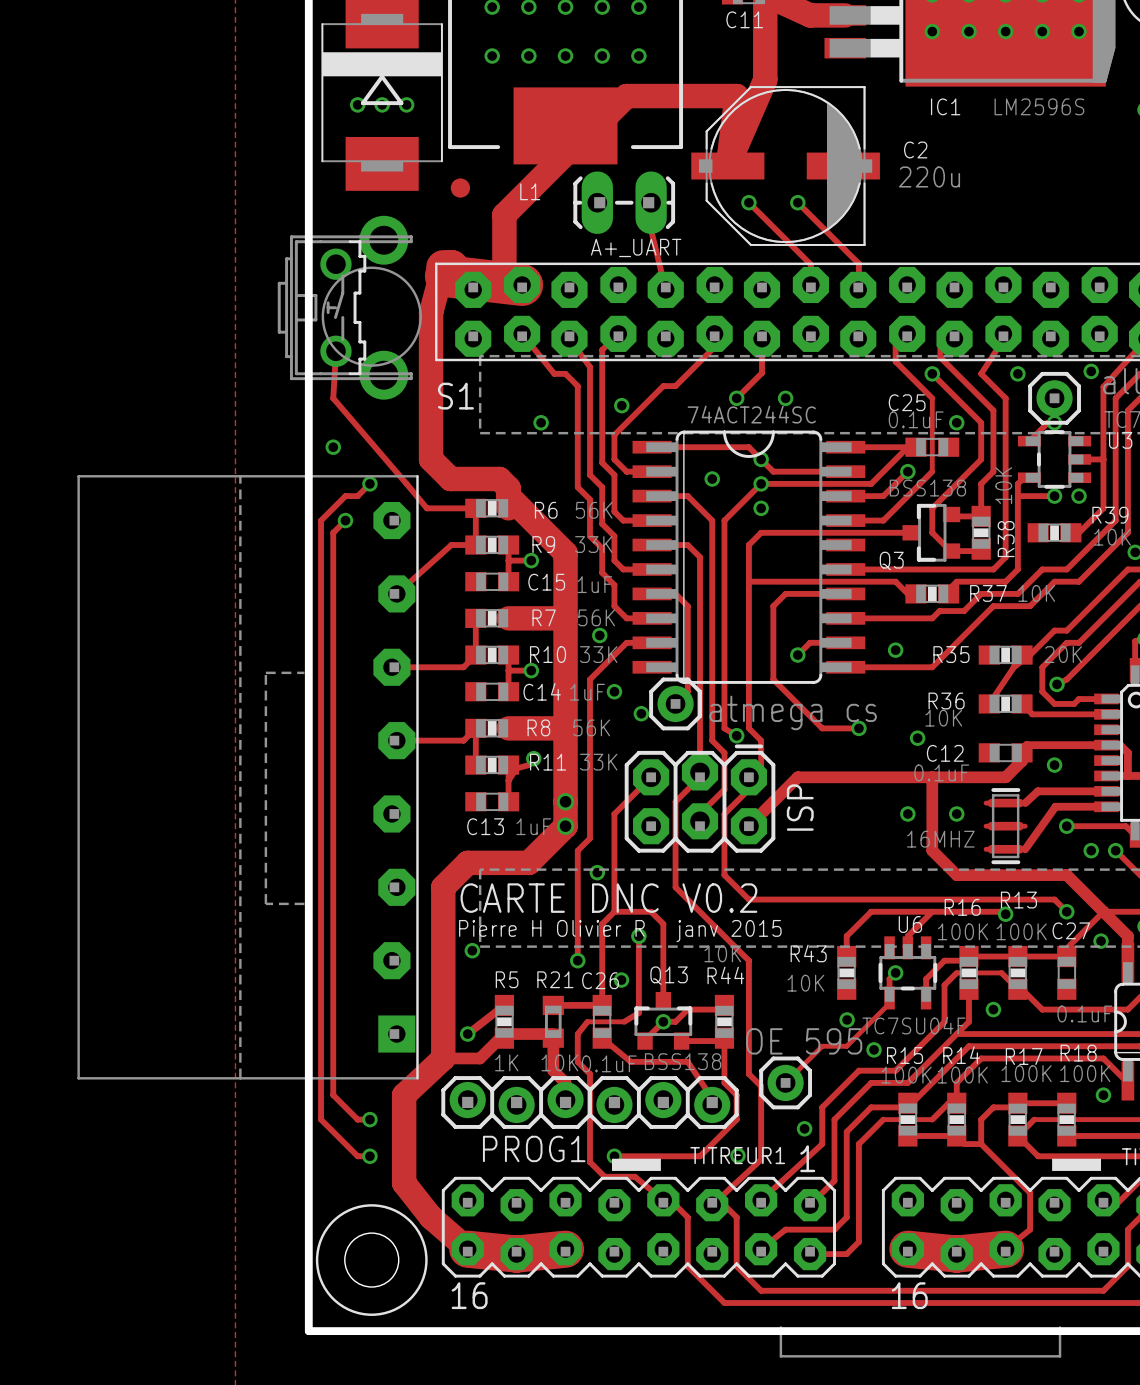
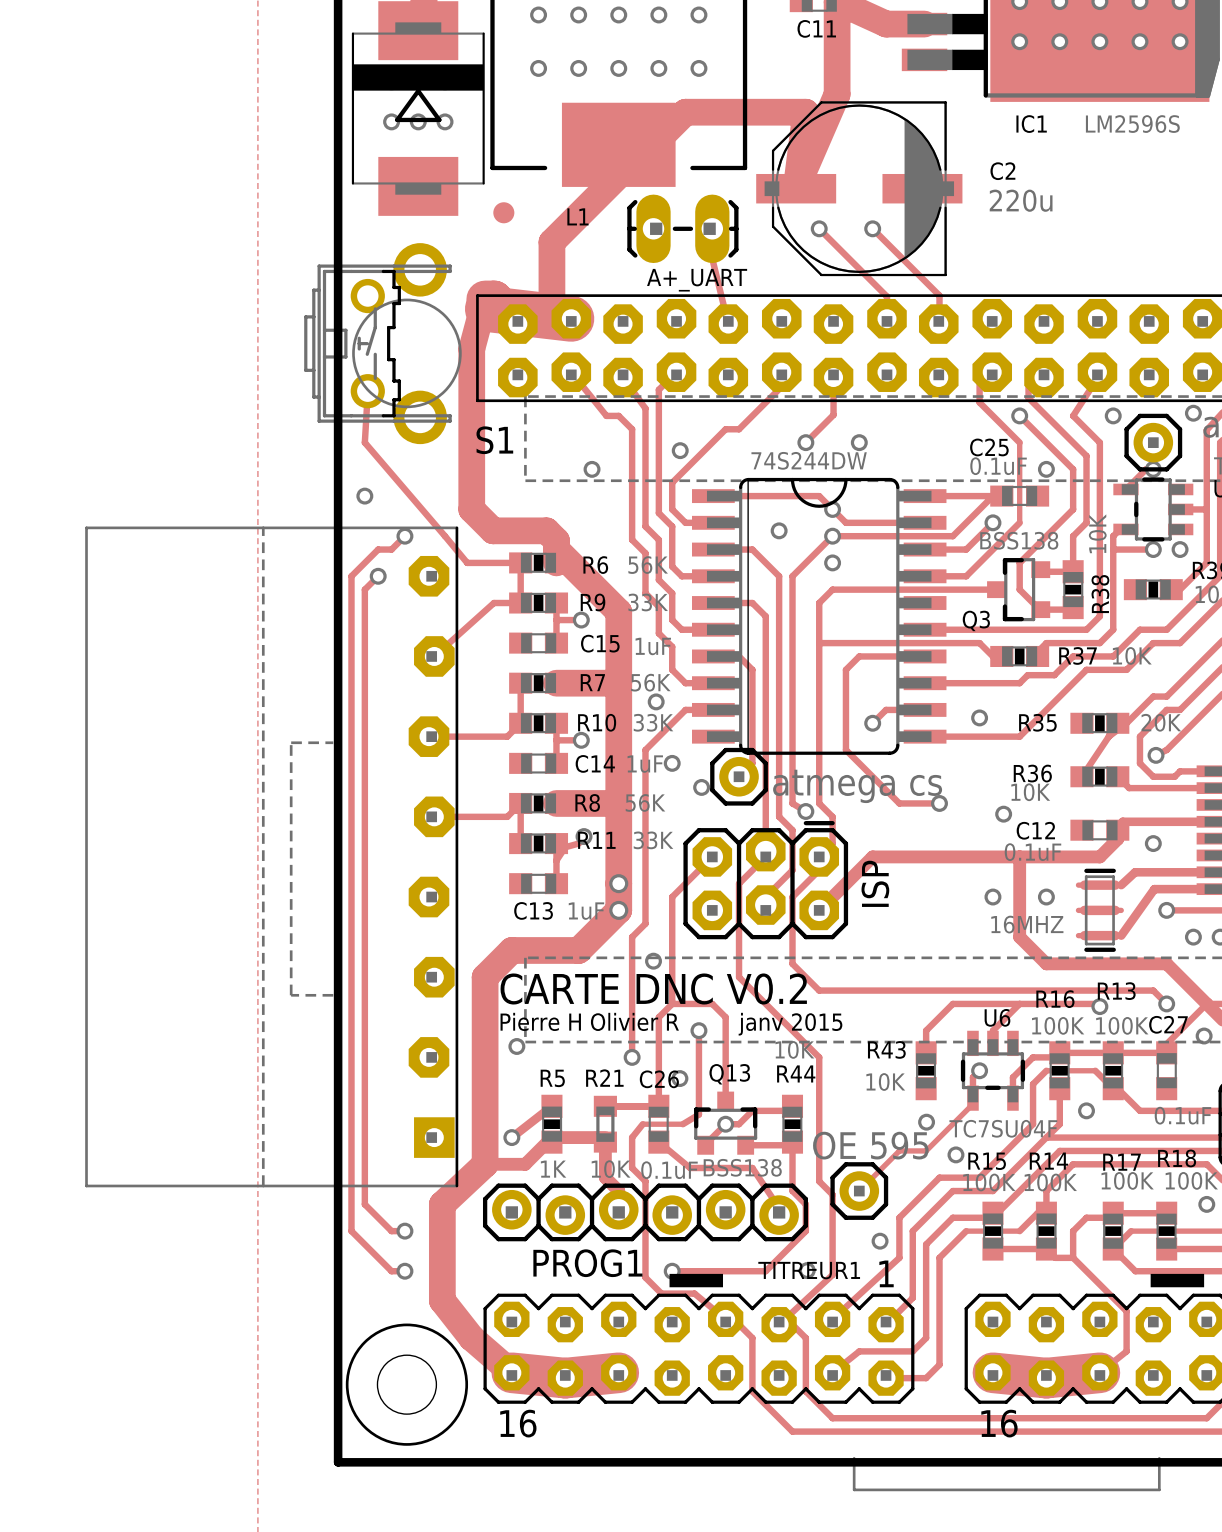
part value: 74ACT244SC (751, 414) -> 74S244DW (809, 460)

